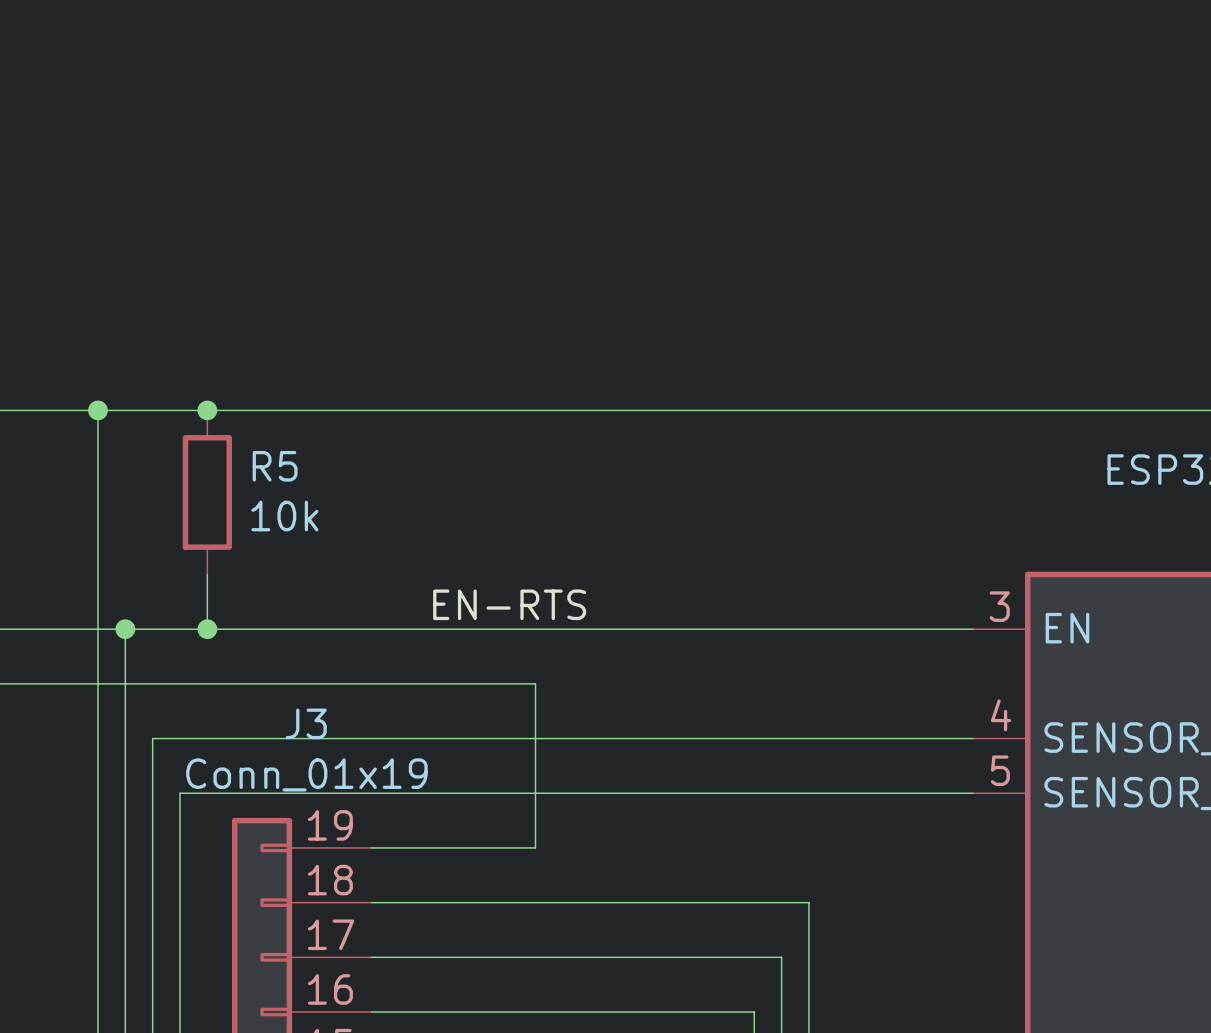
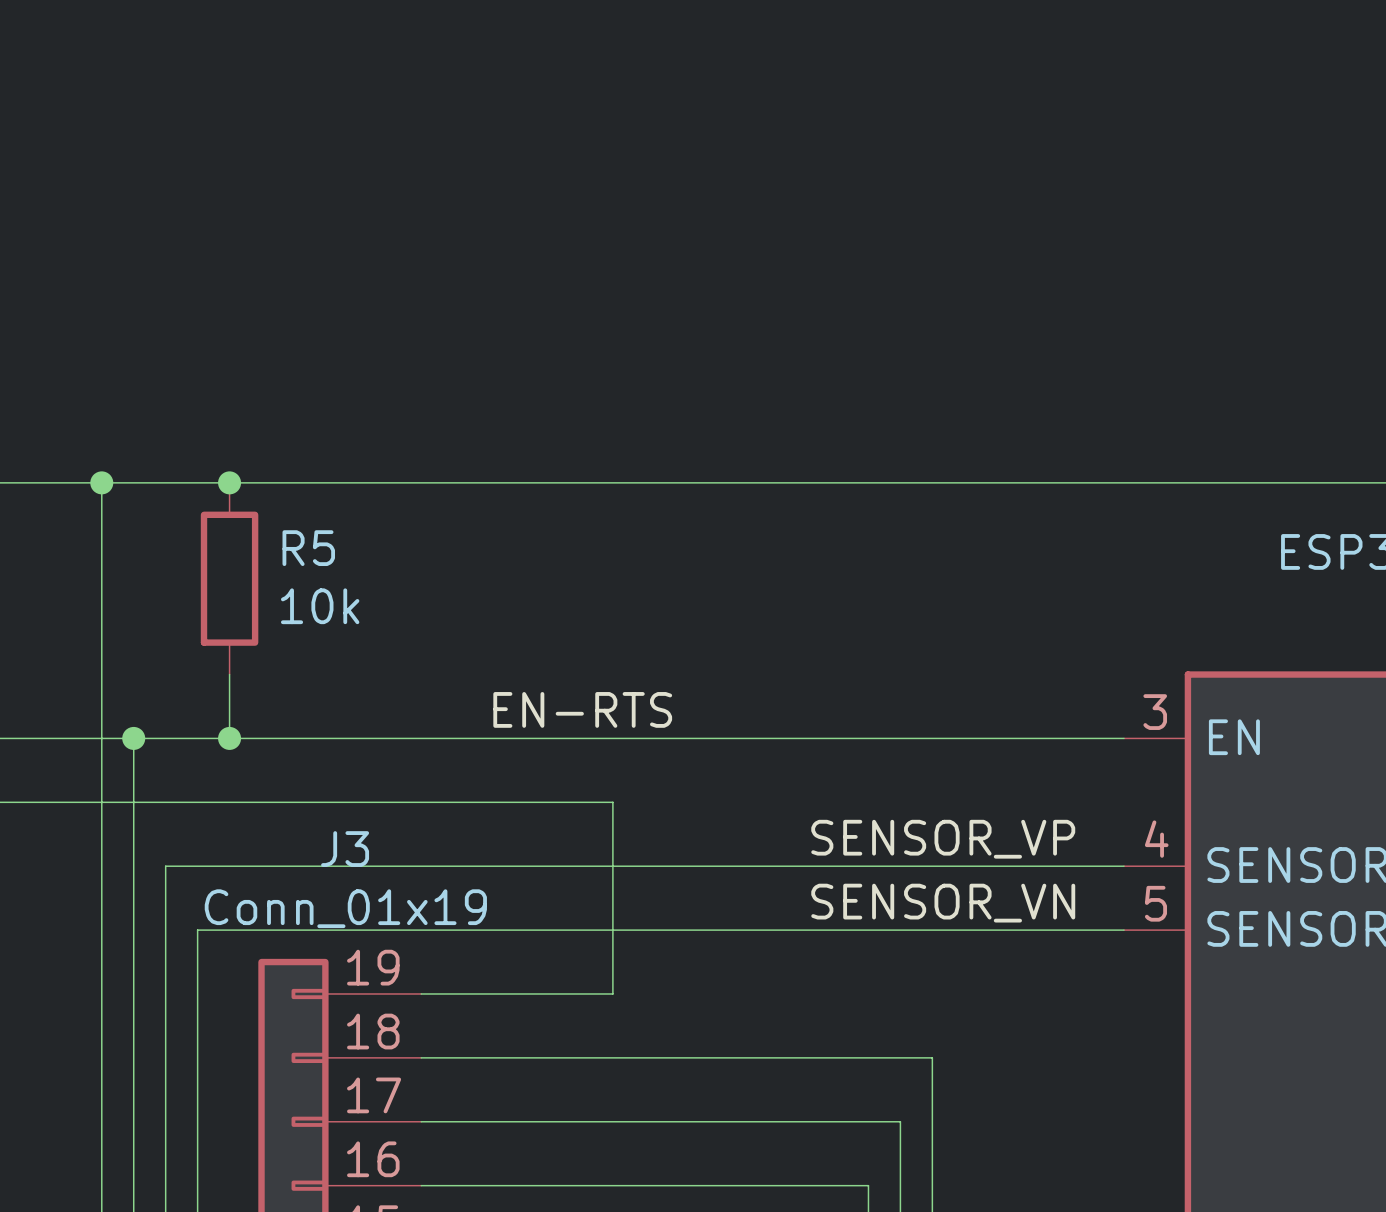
label: none -> SENSOR_VP (943, 839)
label: none -> SENSOR_VN (943, 903)

